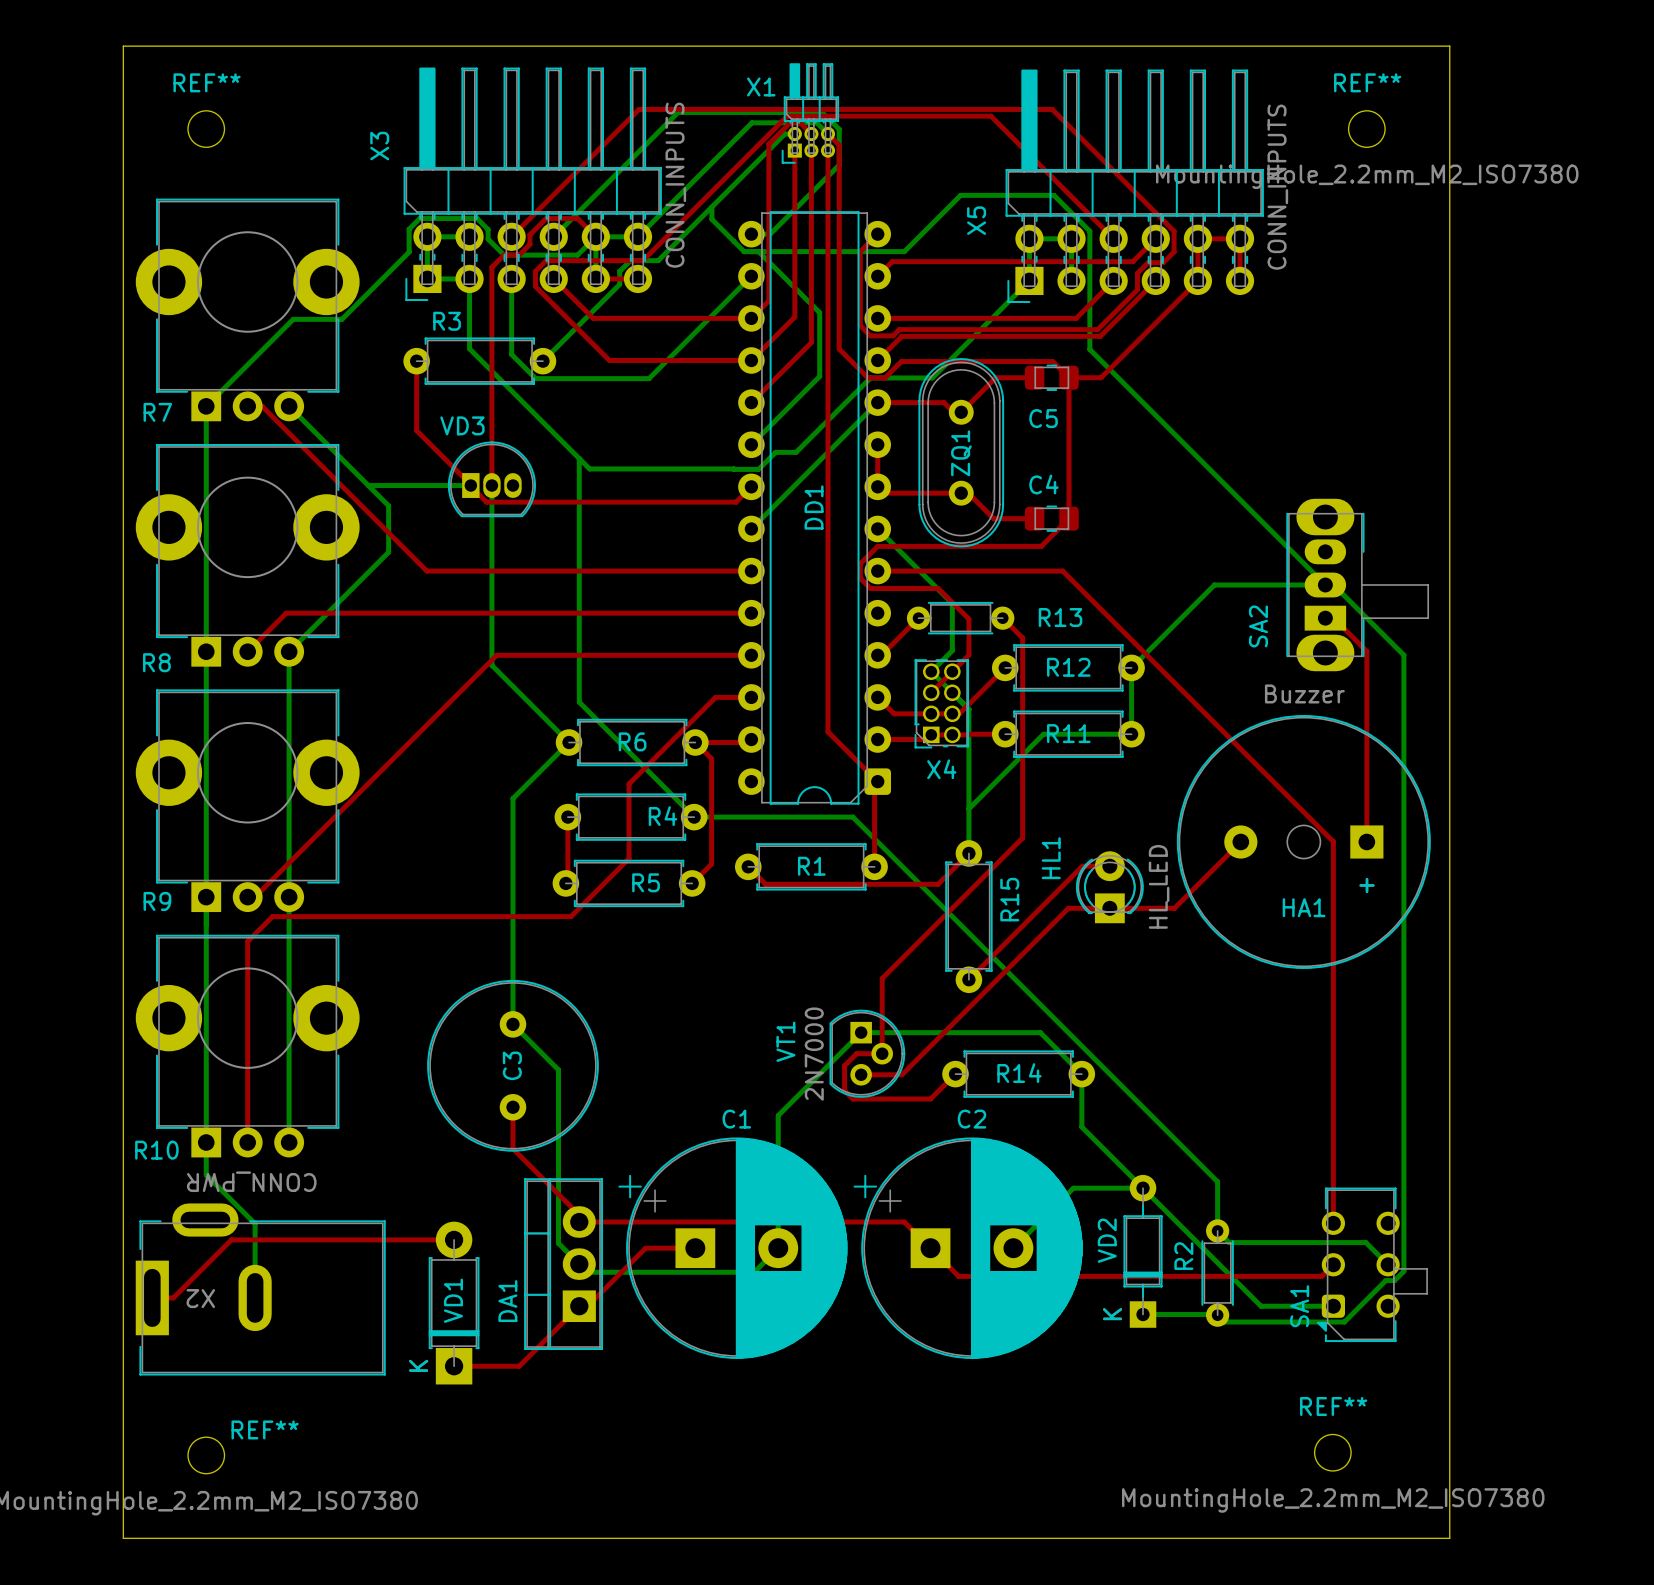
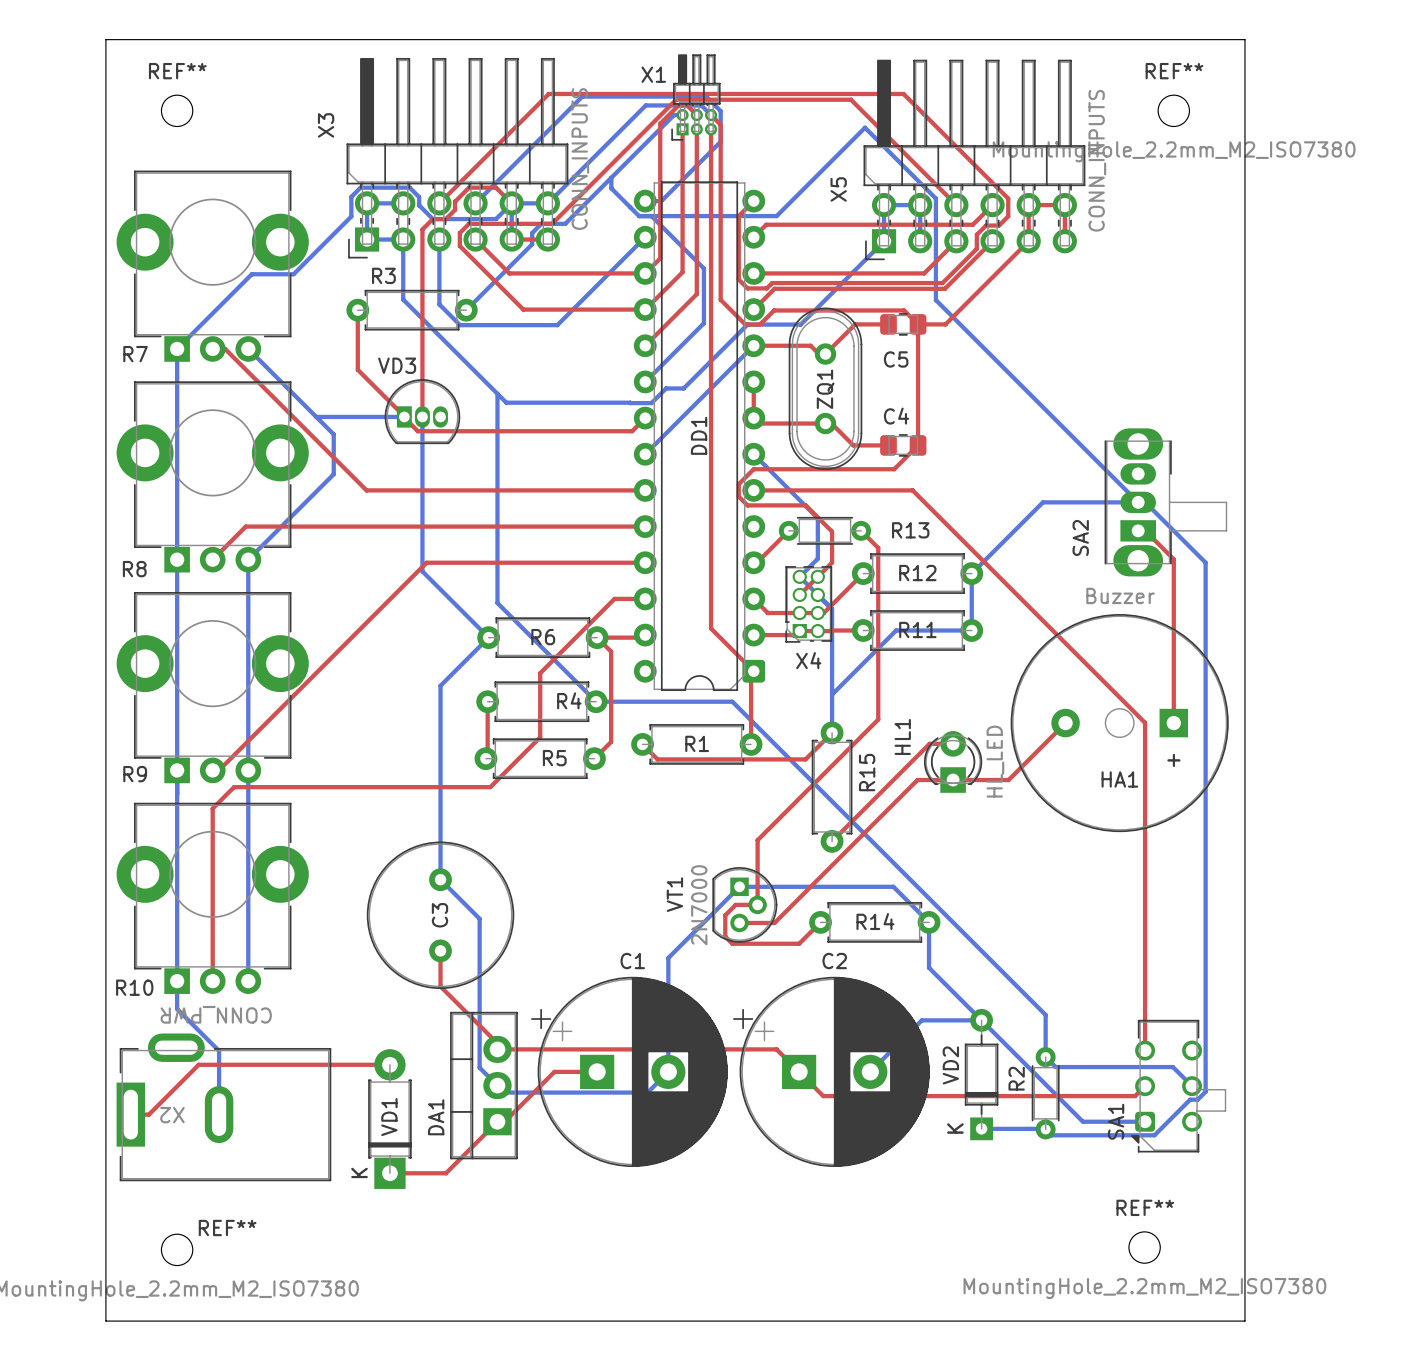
bottom track: (960, 195) (1053, 195) -> (824, 167) (865, 127) (905, 167)

